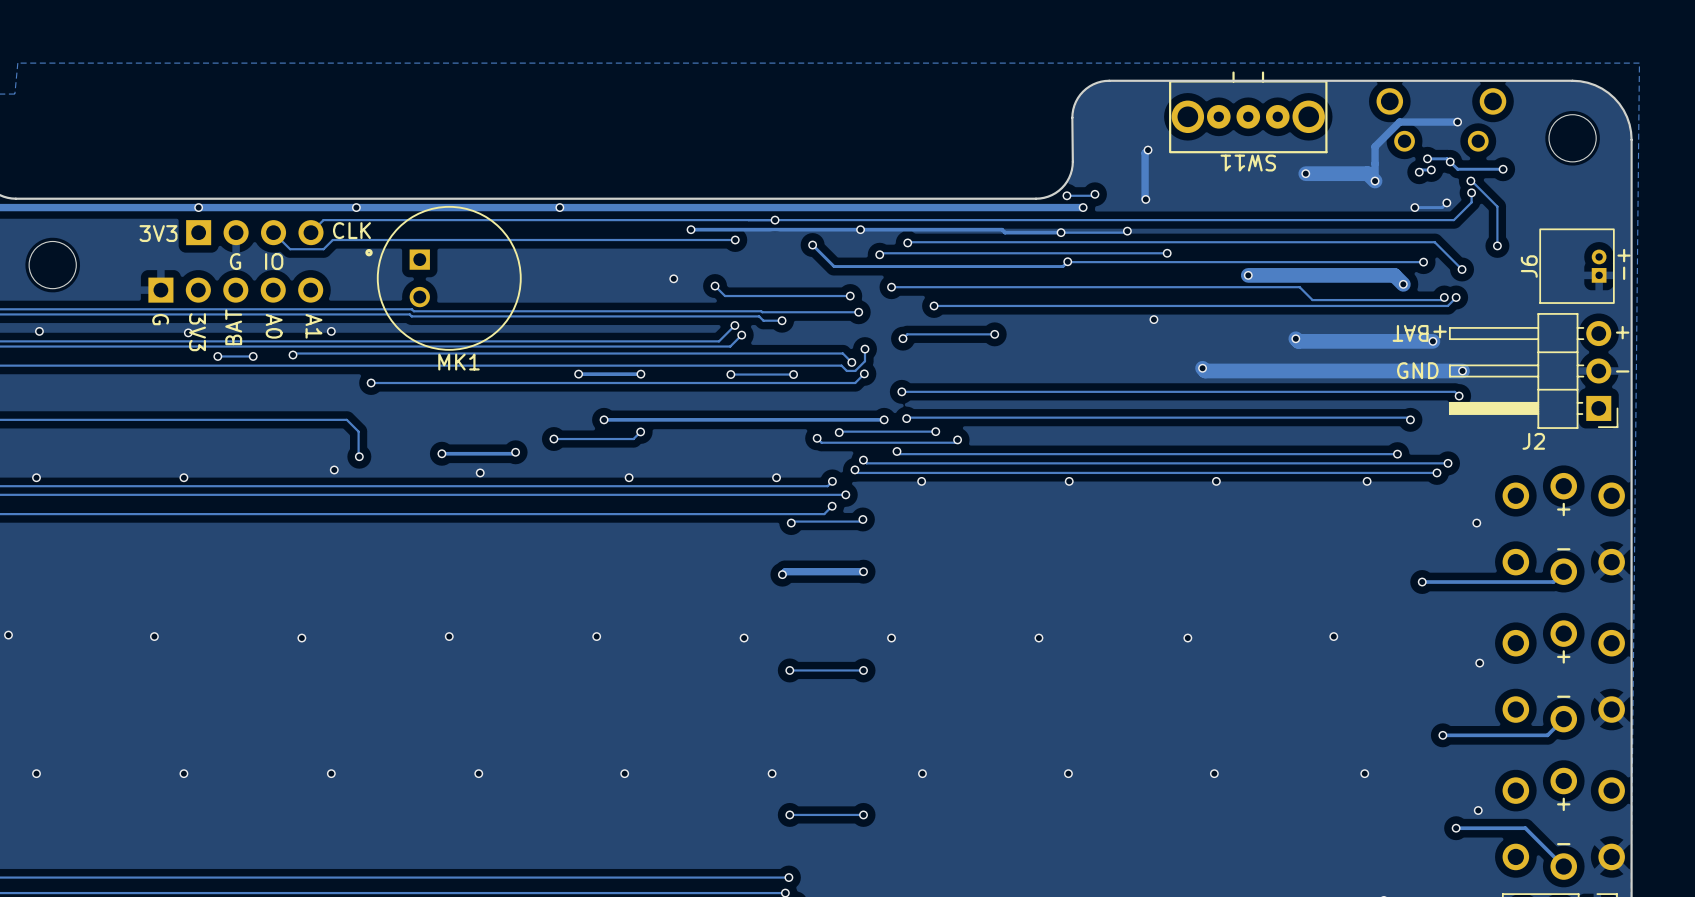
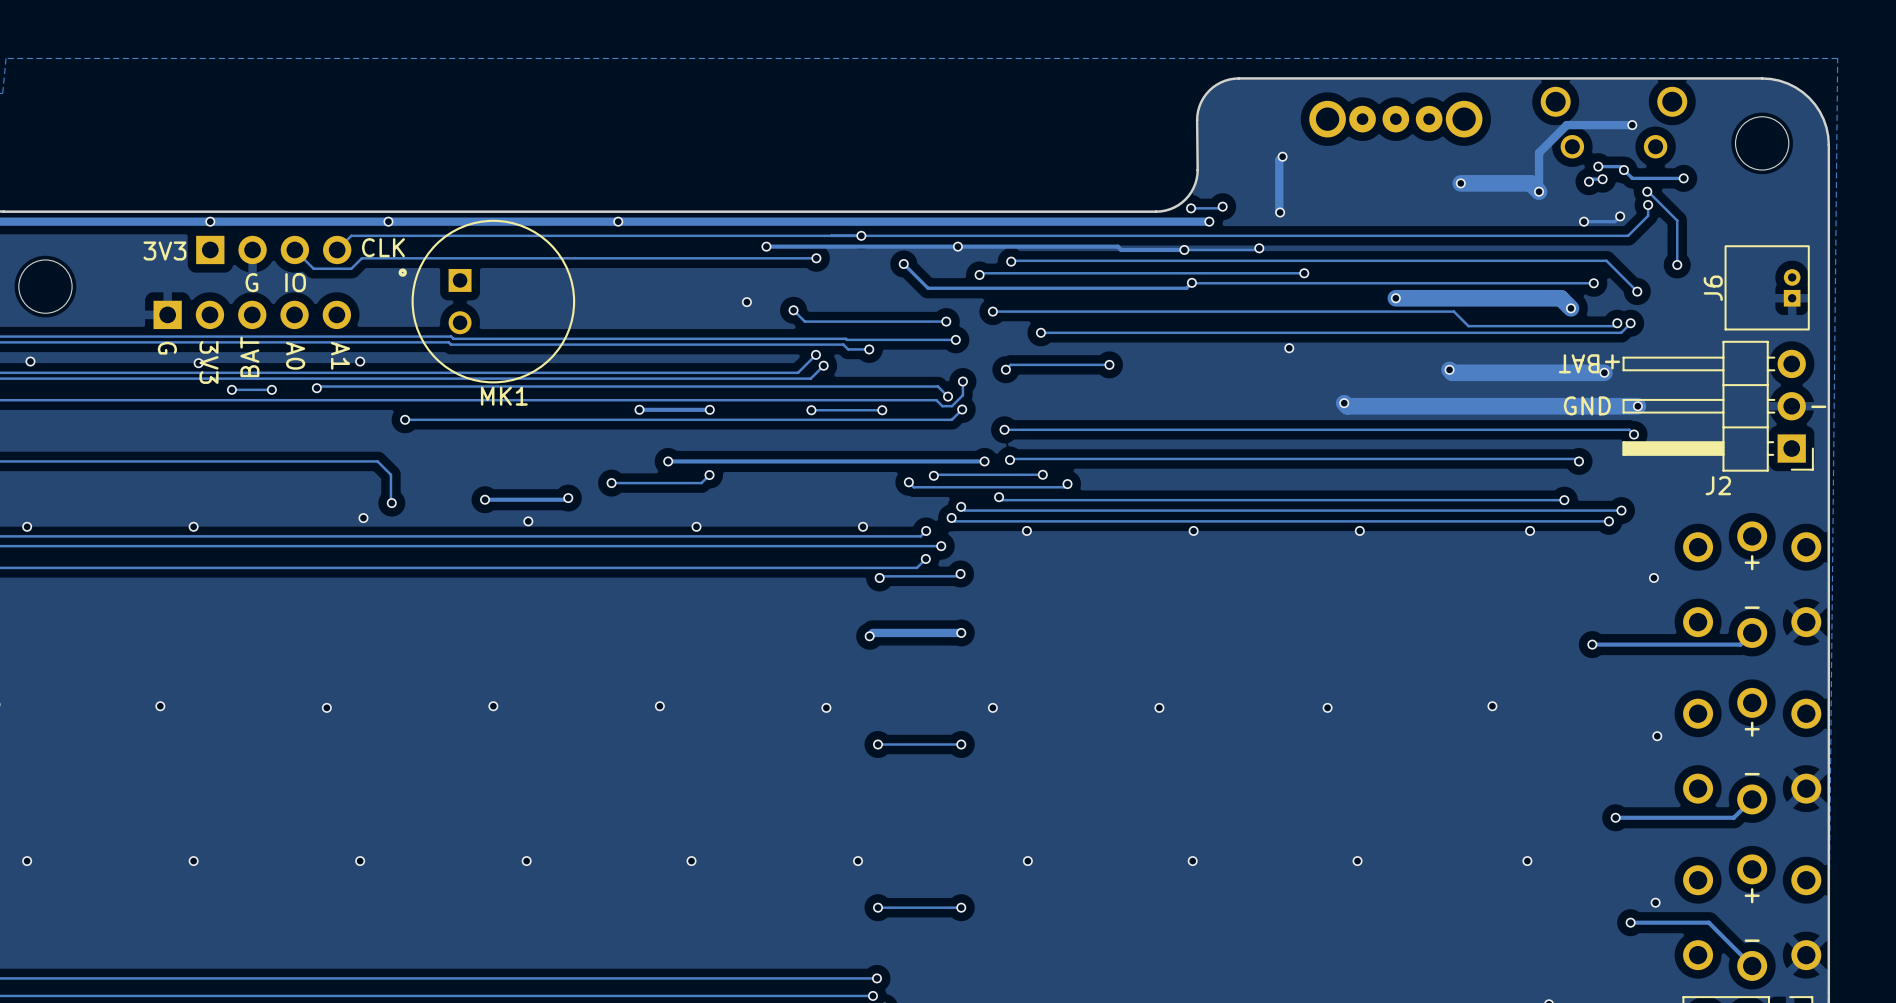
SW11 side: bottom (1248, 112) -> top (1395, 119)
J6 text: + (1624, 255) -> none
J6 text: - (1624, 273) -> none
J6 text: + (1622, 332) -> none

